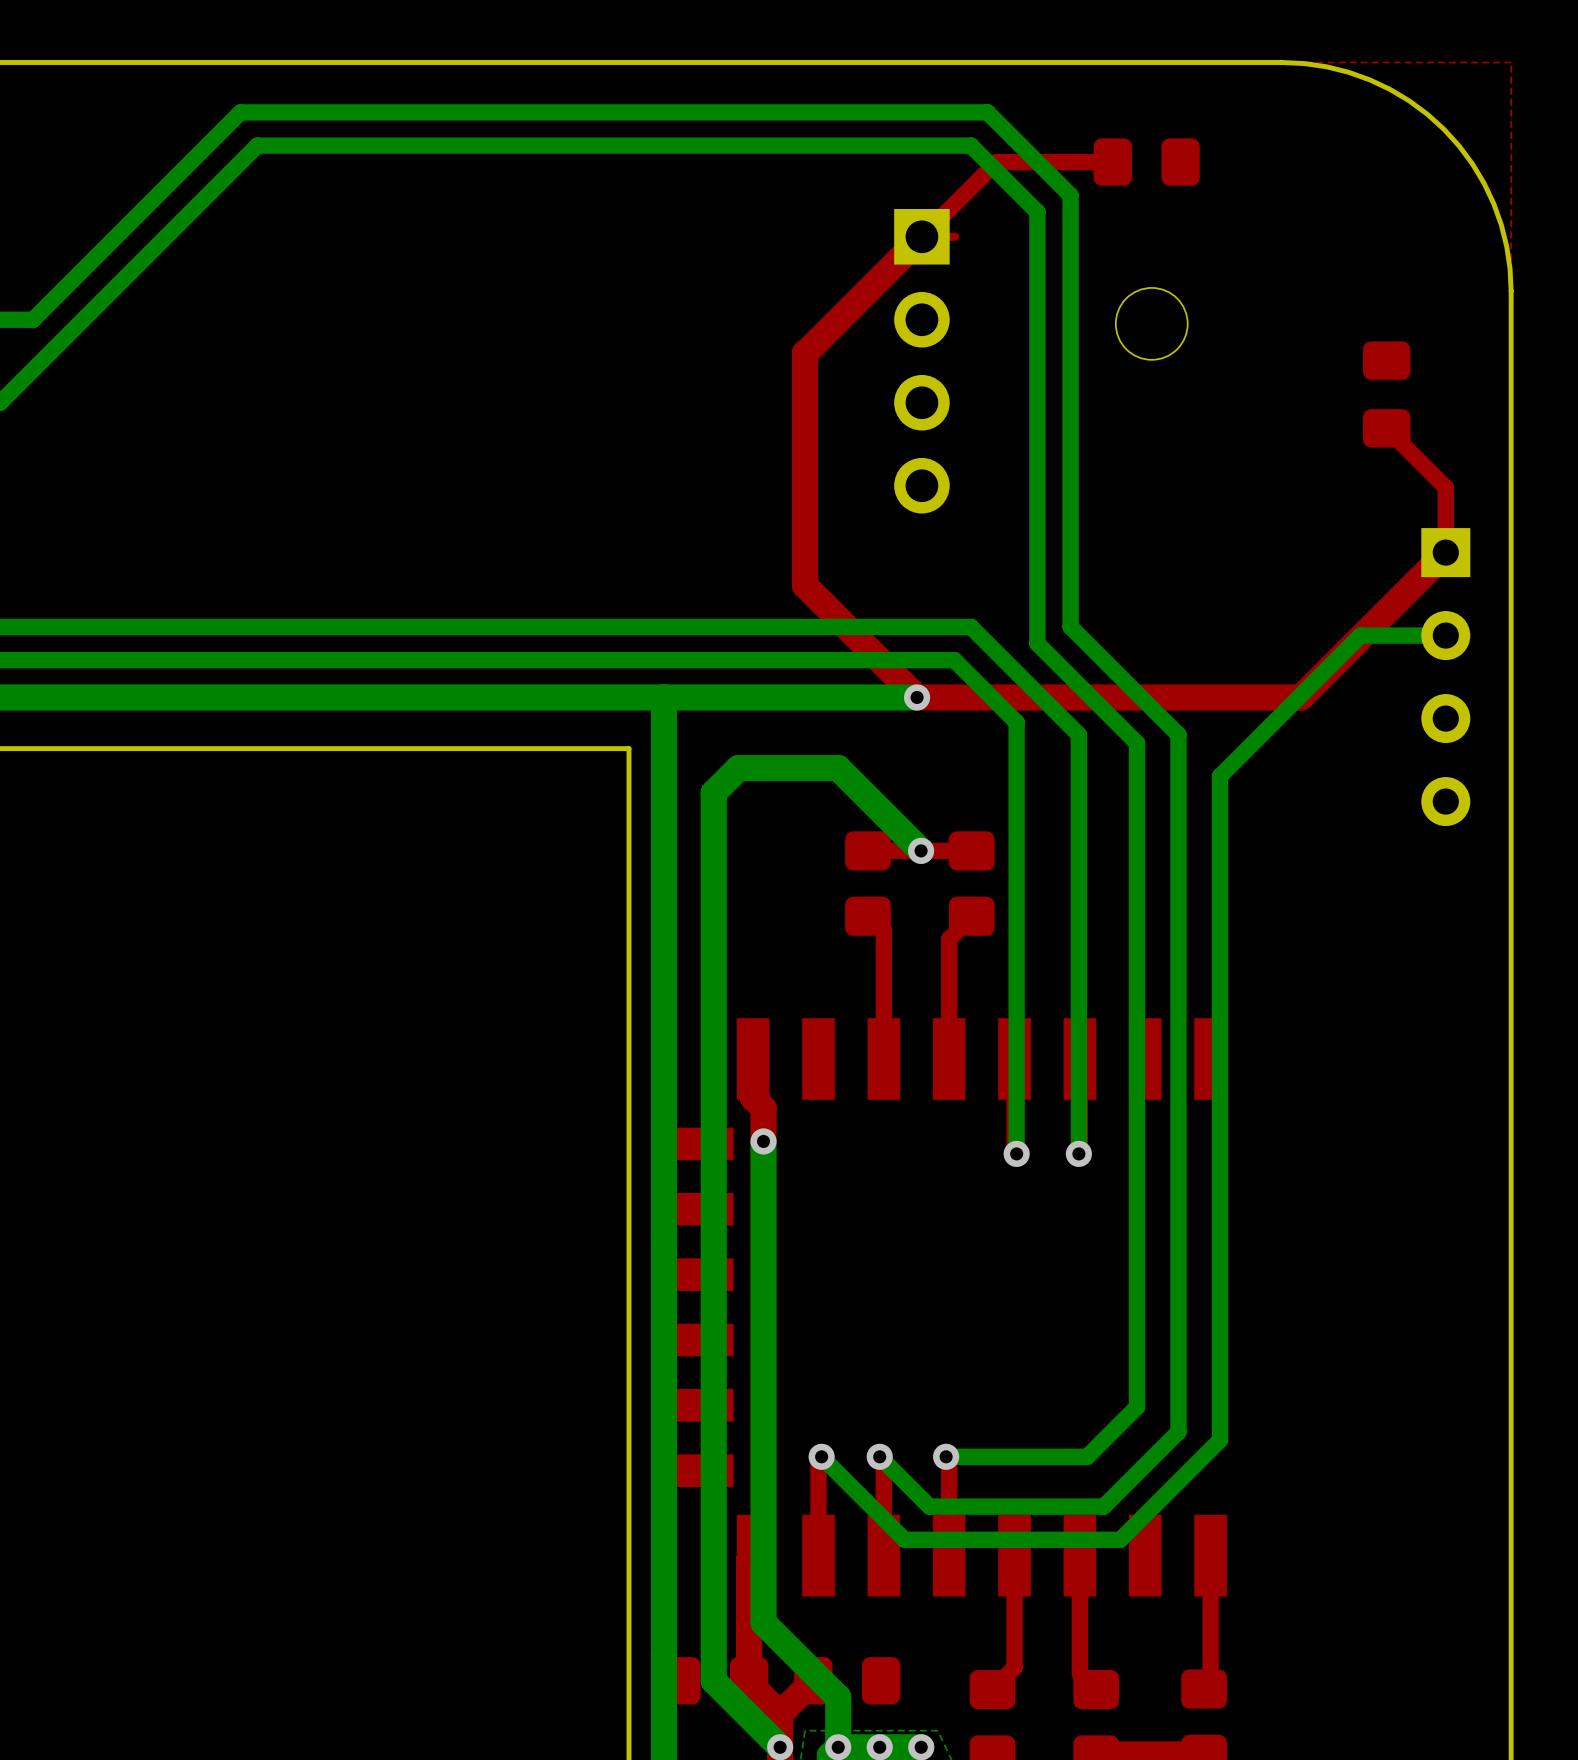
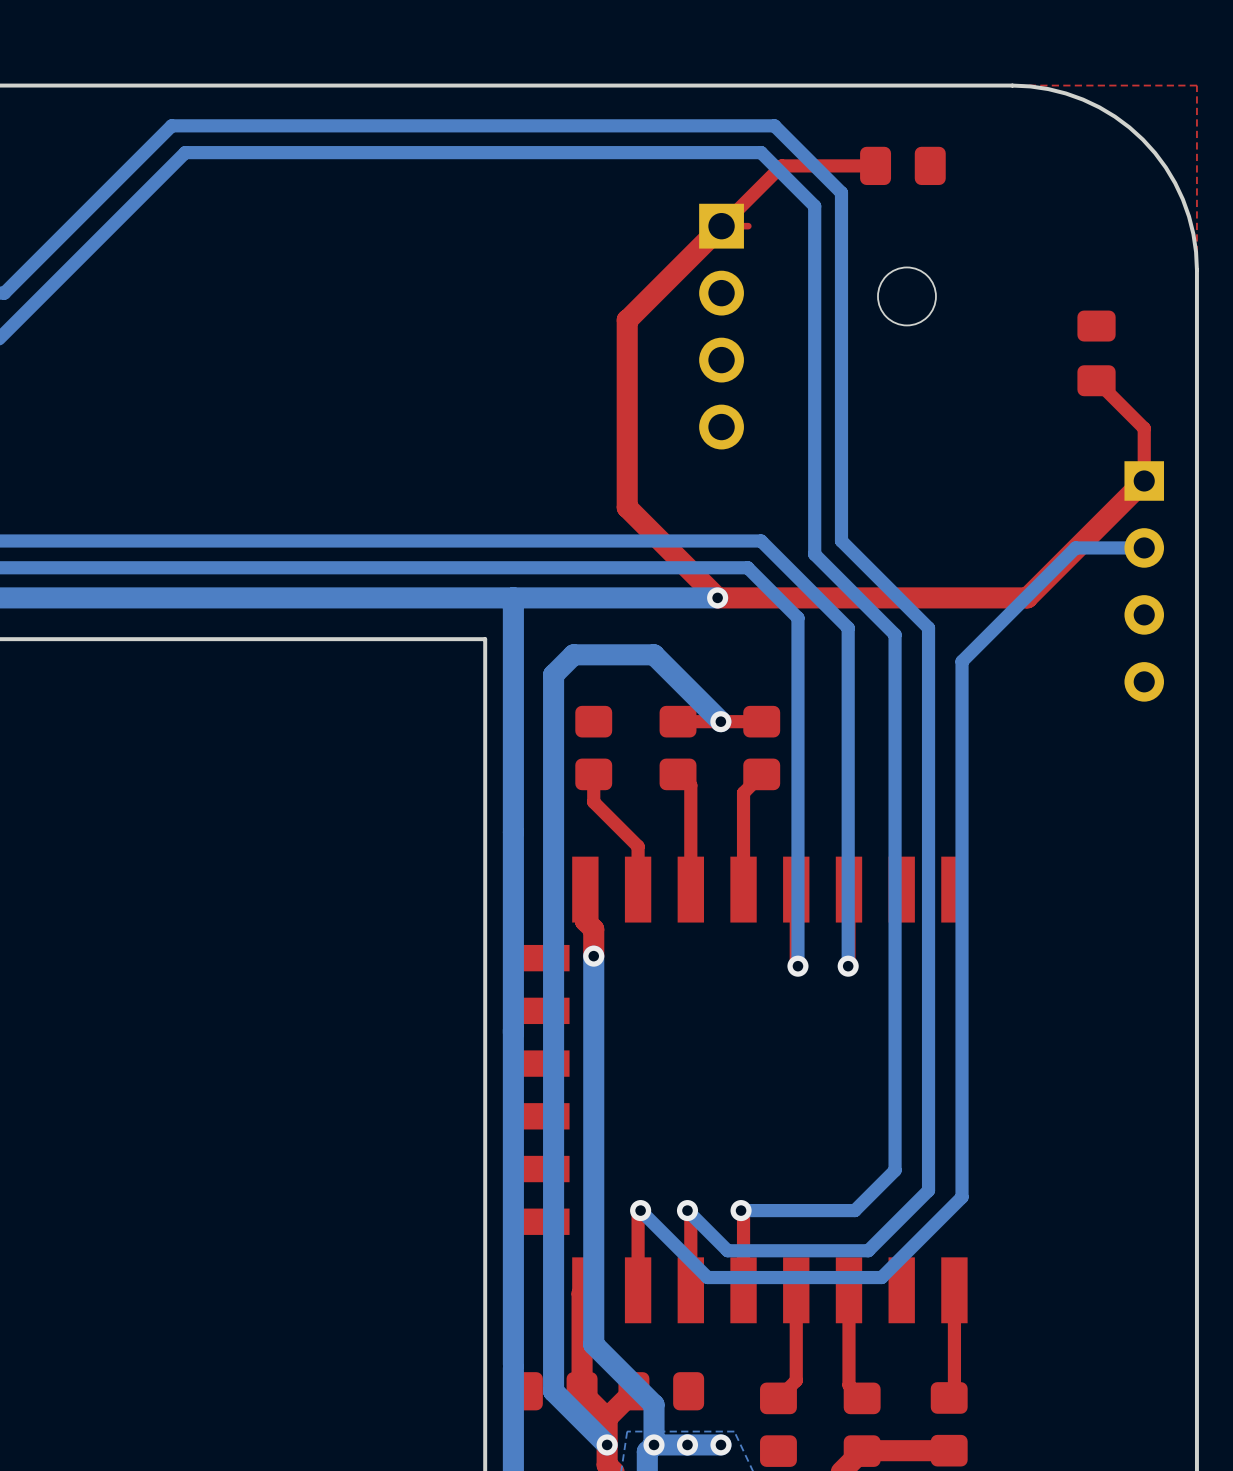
part: none -> (593, 748)
top track: none -> (593, 774) (593, 802) (638, 846) (638, 889)

